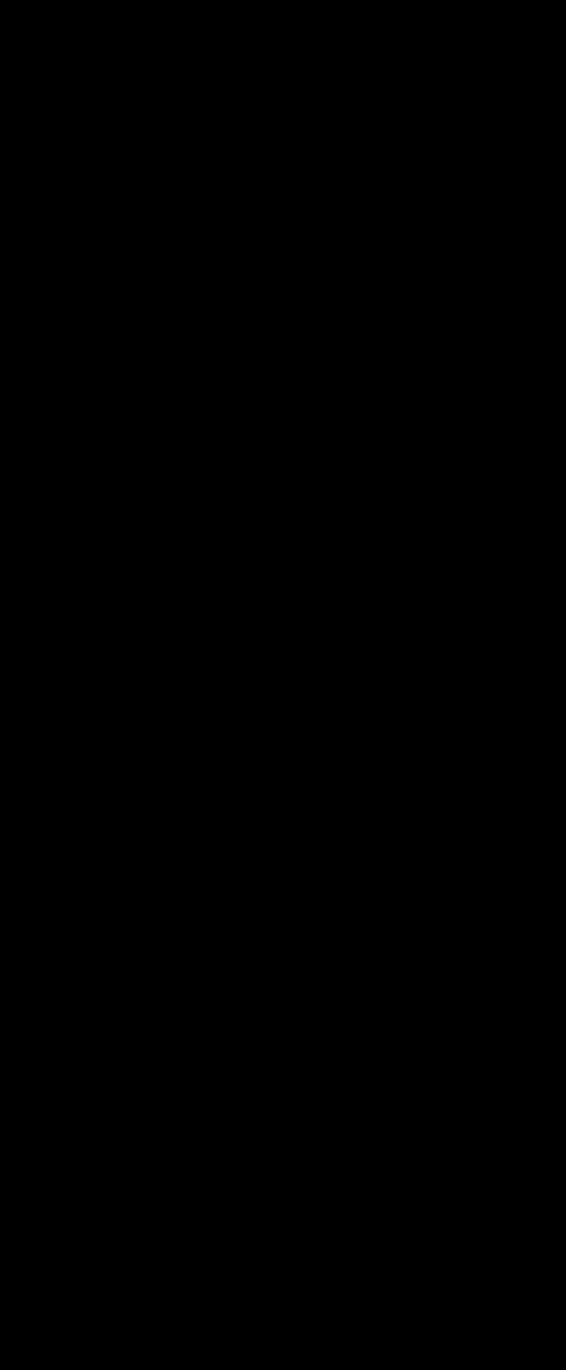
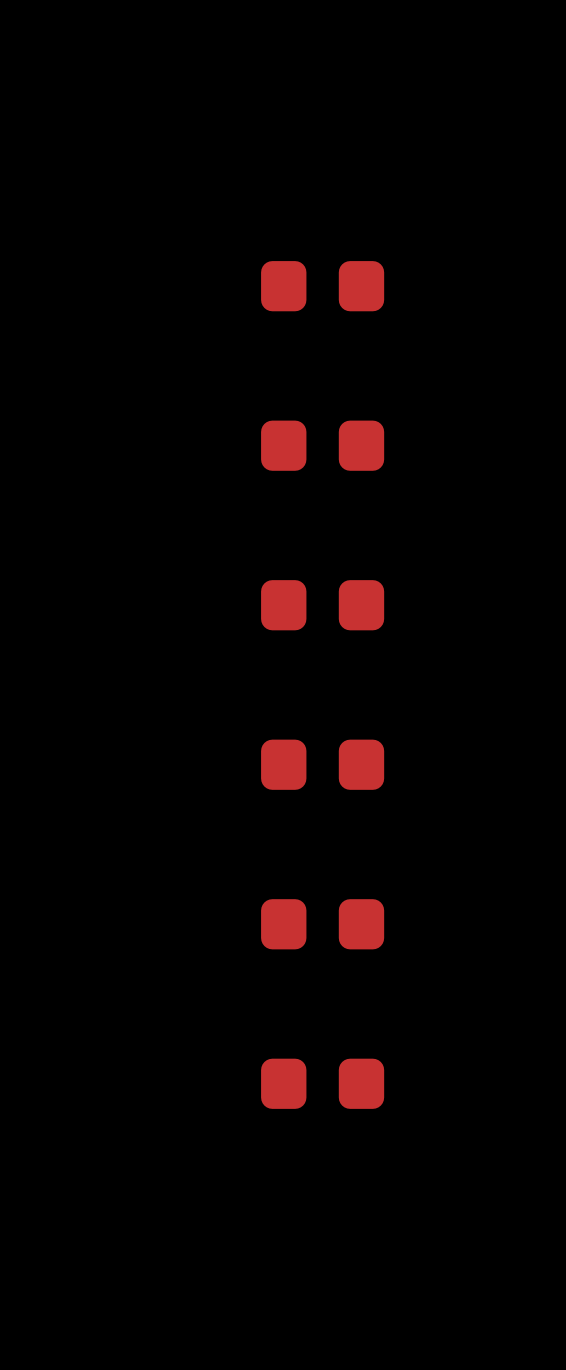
part: none -> (322, 286)
part: none -> (322, 445)
part: none -> (322, 605)
part: none -> (322, 764)
part: none -> (322, 924)
part: none -> (322, 1083)

